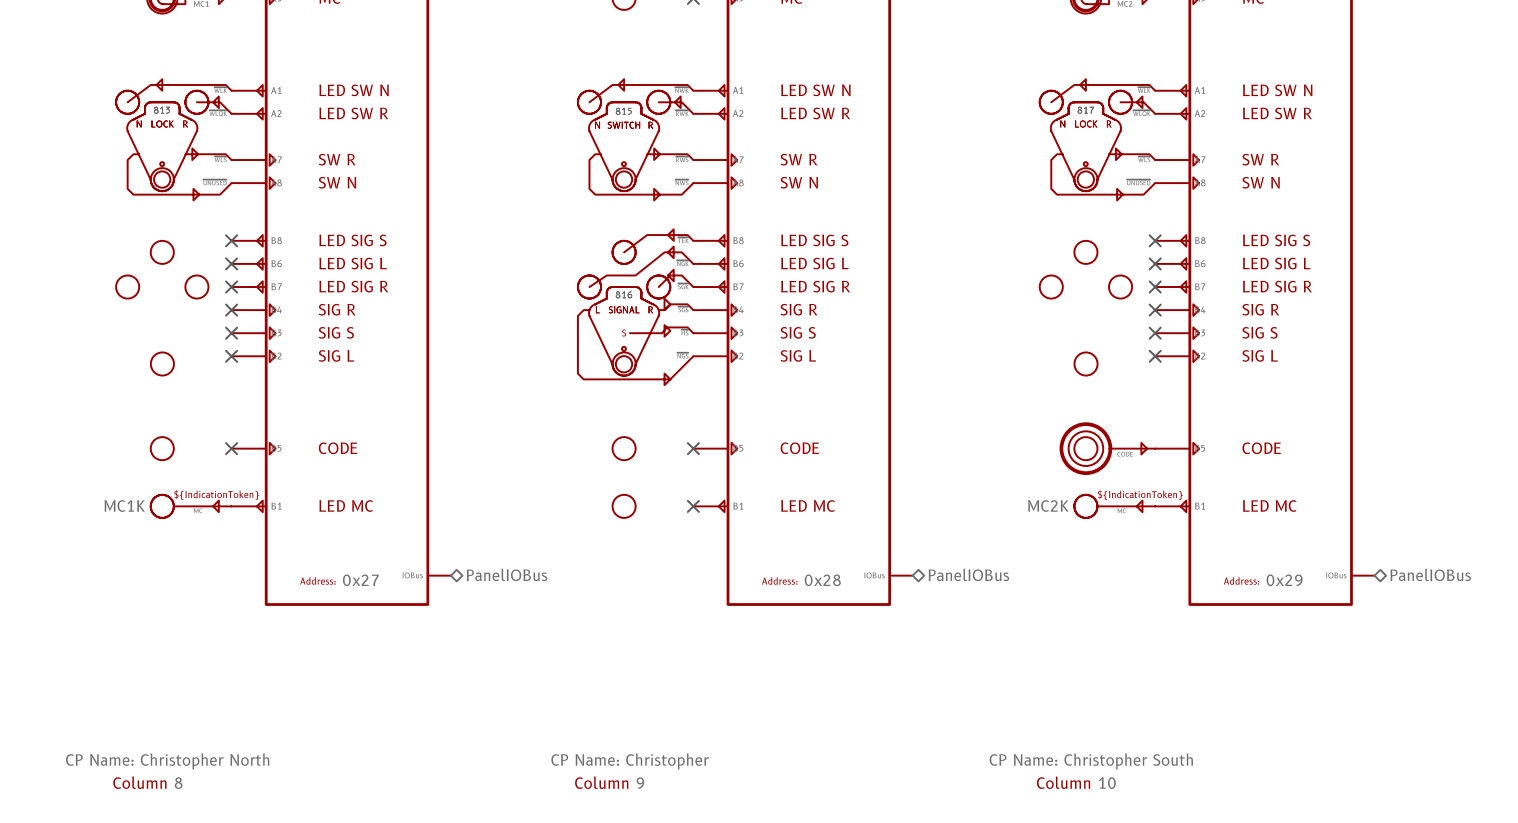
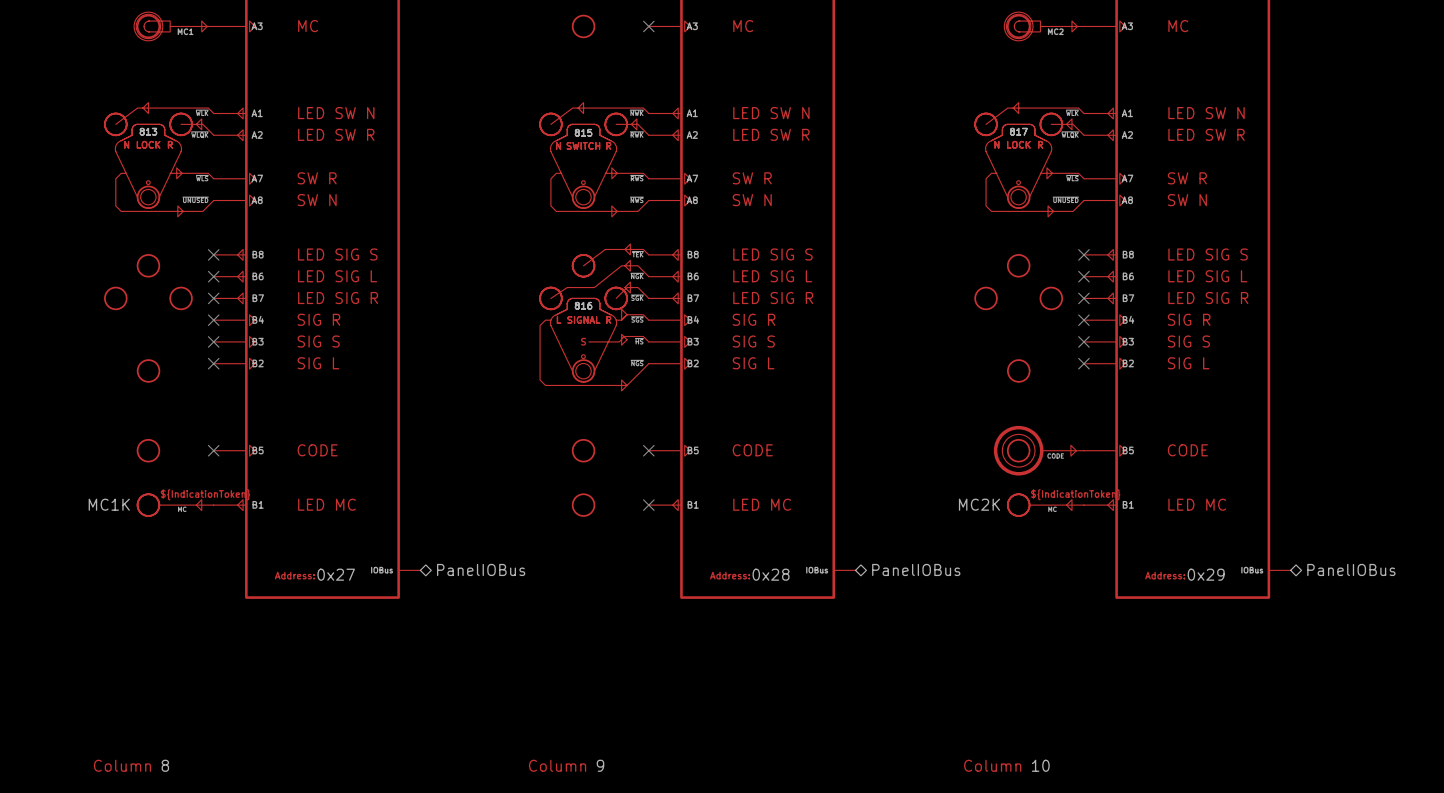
part text: CP Name: Christopher North (167, 761) -> none
part text: CP Name: Christopher (630, 761) -> none
part text: CP Name: Christopher South (1091, 761) -> none

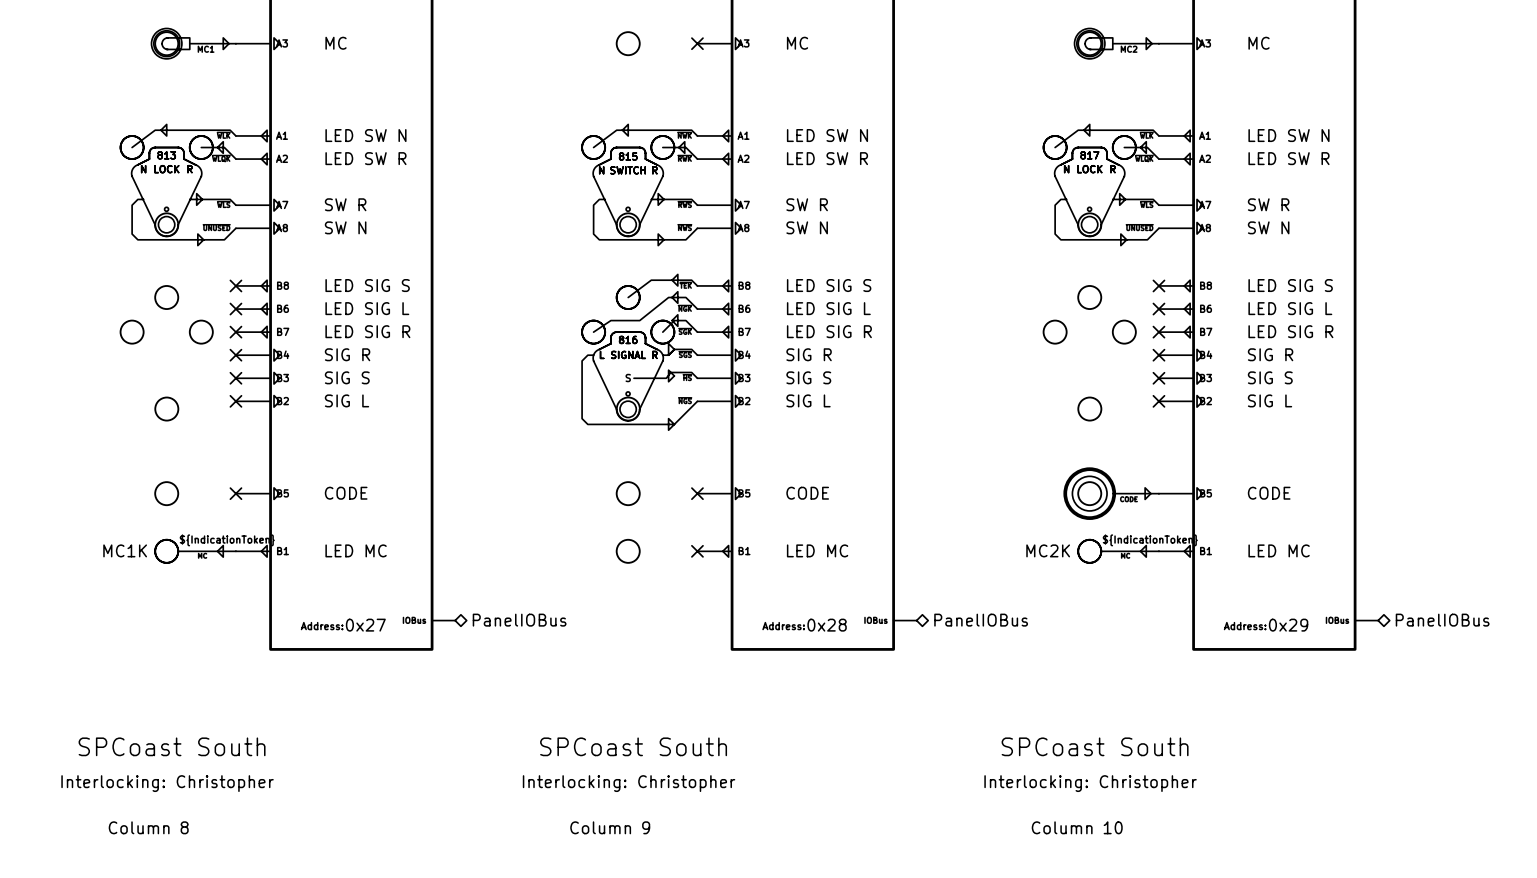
part text: none -> SPCoast South (172, 746)
part text: none -> SPCoast South (633, 746)
part text: none -> SPCoast South (1095, 746)
part text: none -> Interlocking: Christopher (167, 783)
part text: none -> Interlocking: Christopher (629, 783)
part text: none -> Interlocking: Christopher (1090, 783)

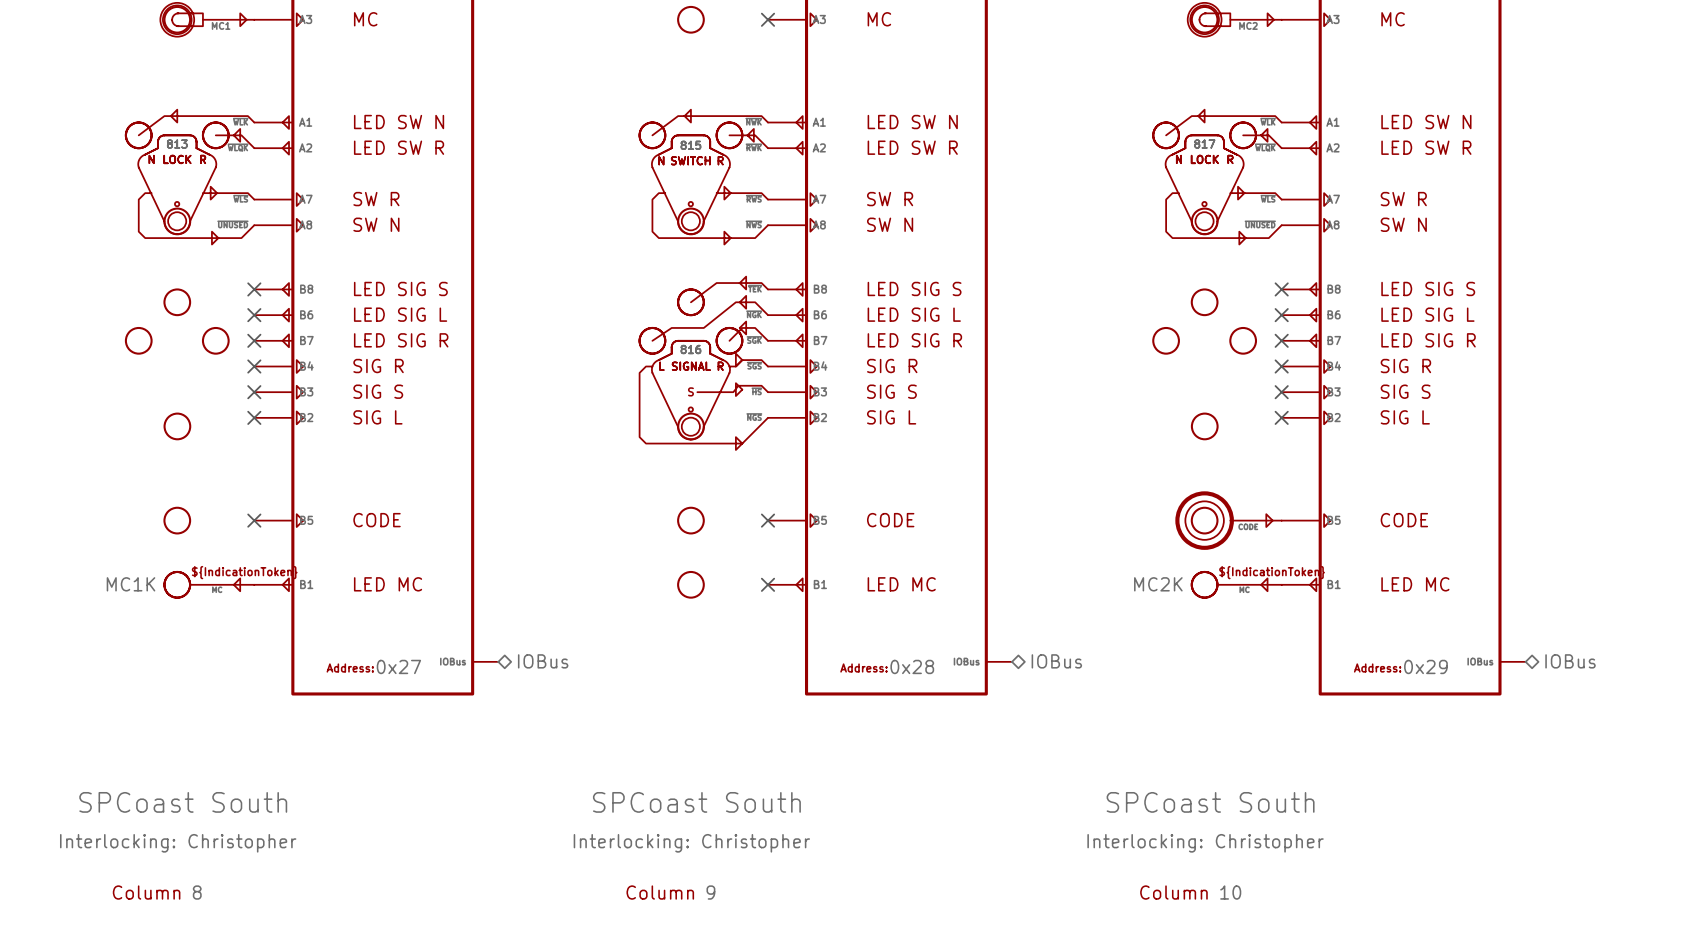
hierarchical label: PanelIOBus (519, 620) -> IOBus (543, 661)
hierarchical label: PanelIOBus (981, 620) -> IOBus (1056, 661)
hierarchical label: PanelIOBus (1442, 620) -> IOBus (1570, 661)

